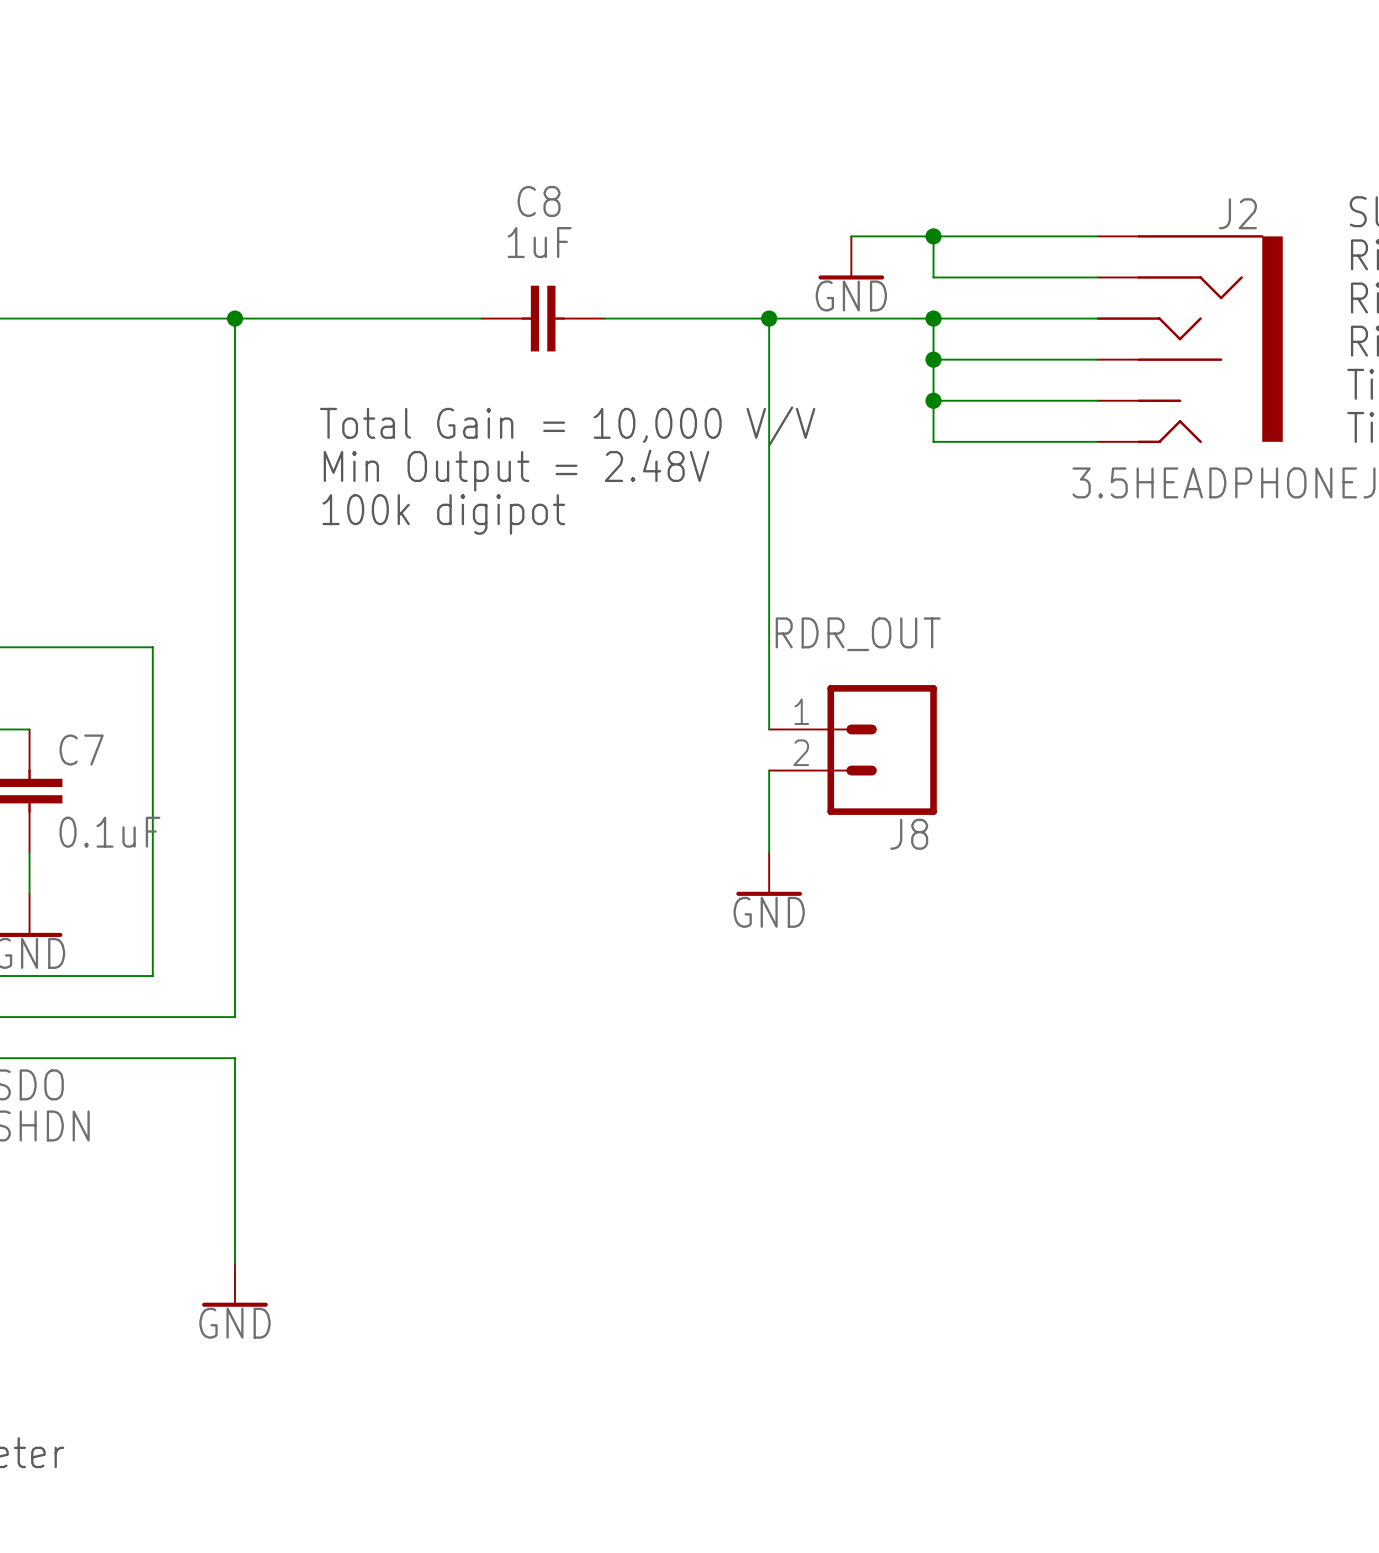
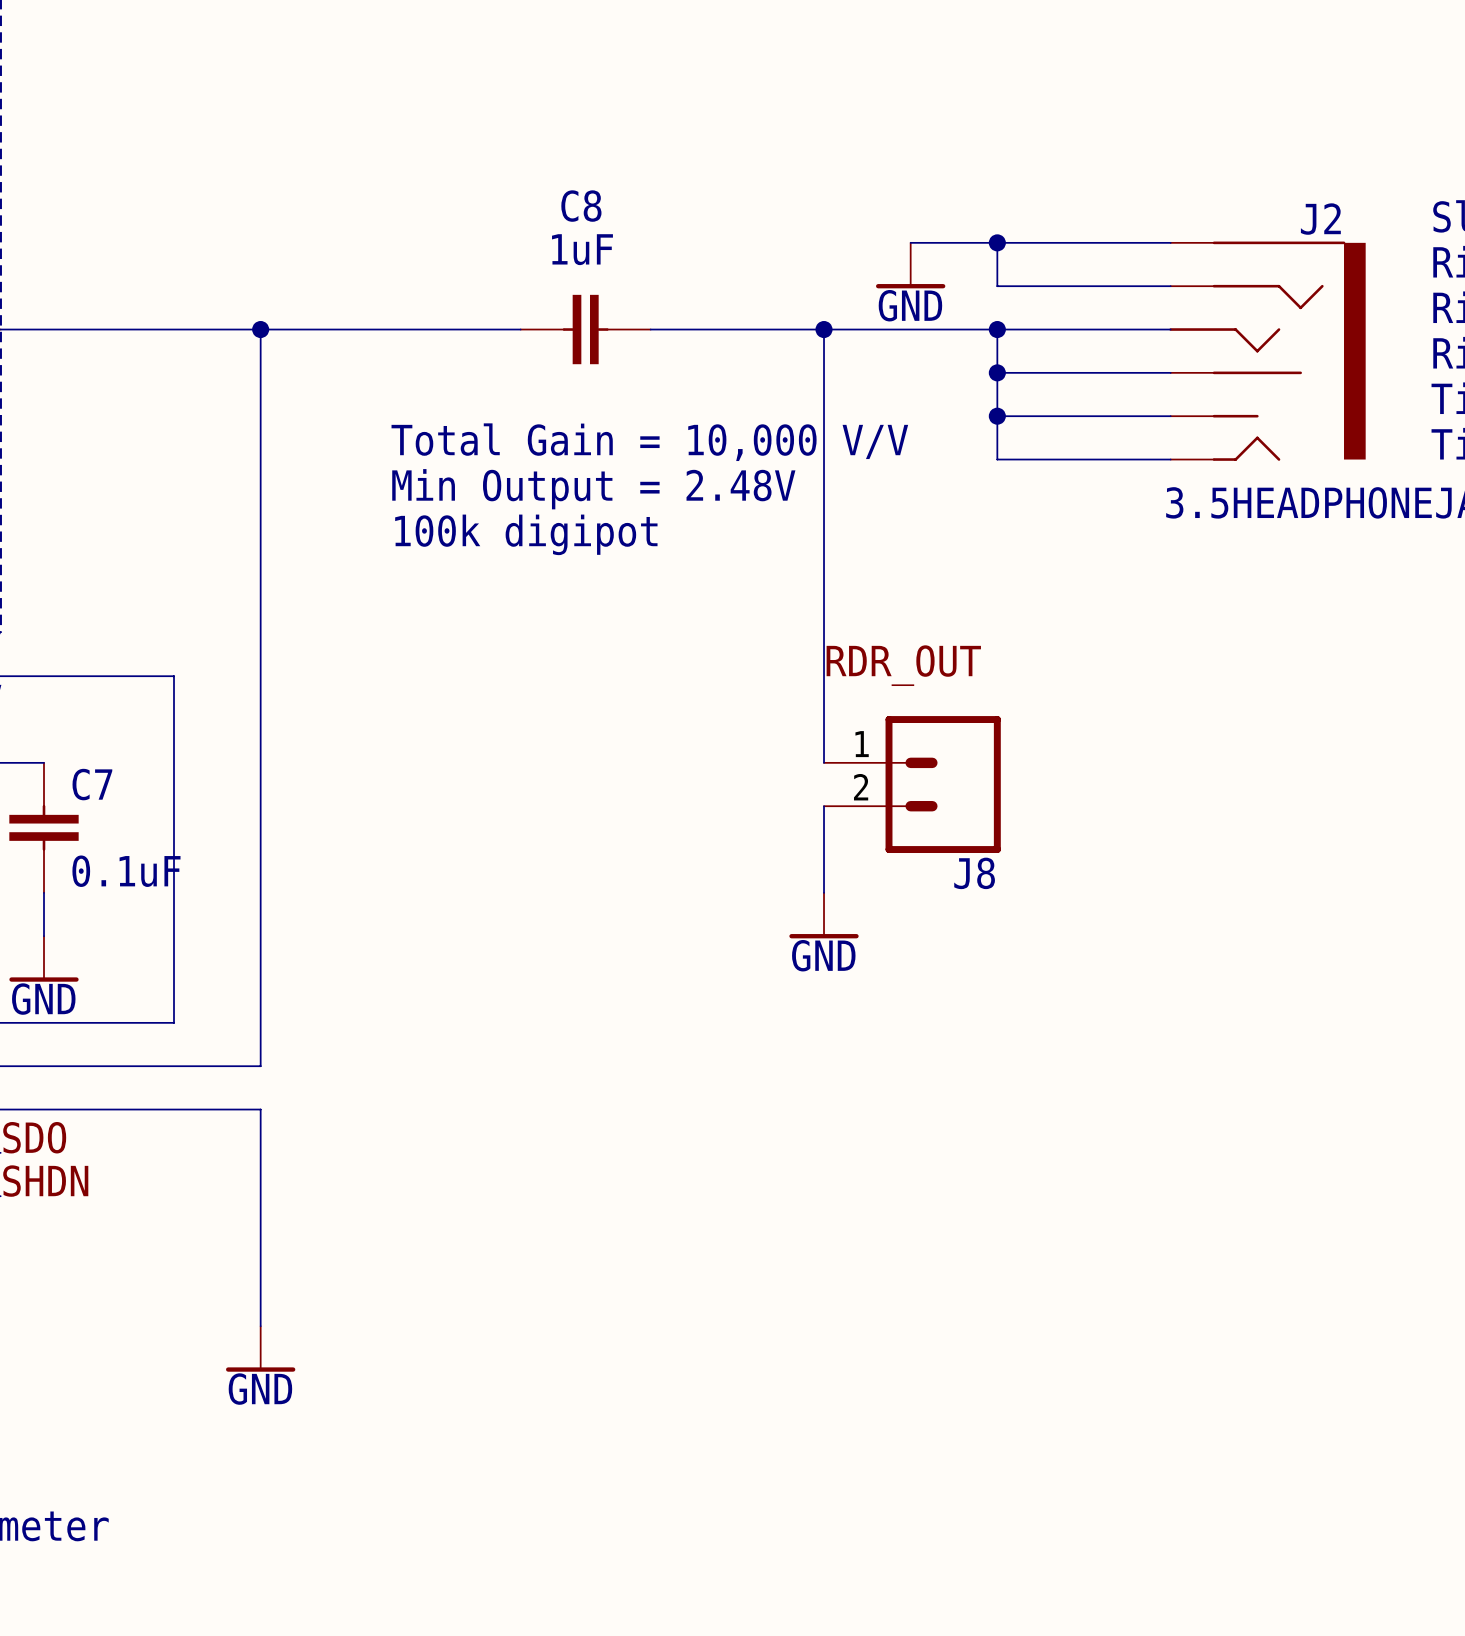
text position: Total Gain = 10,000 V/V (567, 426) -> Total Gain = 10,000 V/V (649, 442)
text position: Min Output = 2.48V (516, 470) -> Min Output = 2.48V (593, 489)
text position: 100k digipot (443, 514) -> 100k digipot (526, 534)

